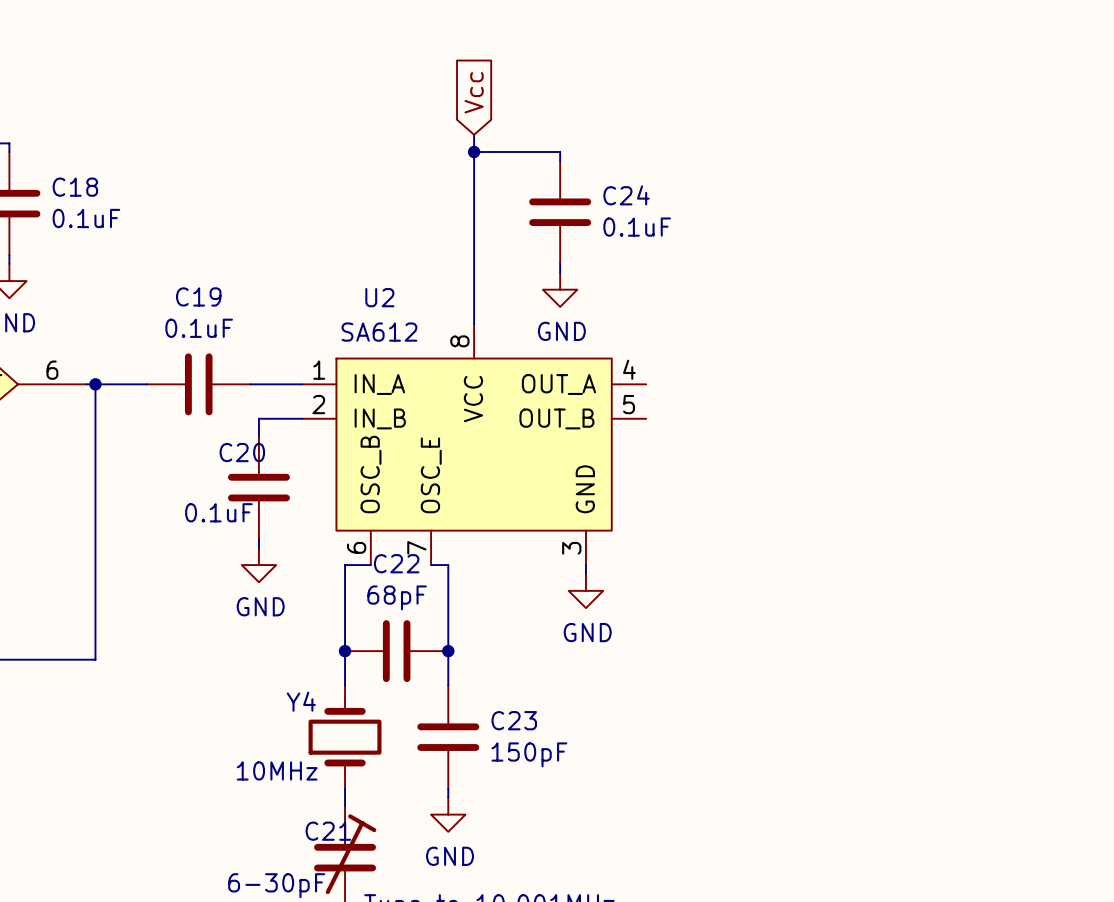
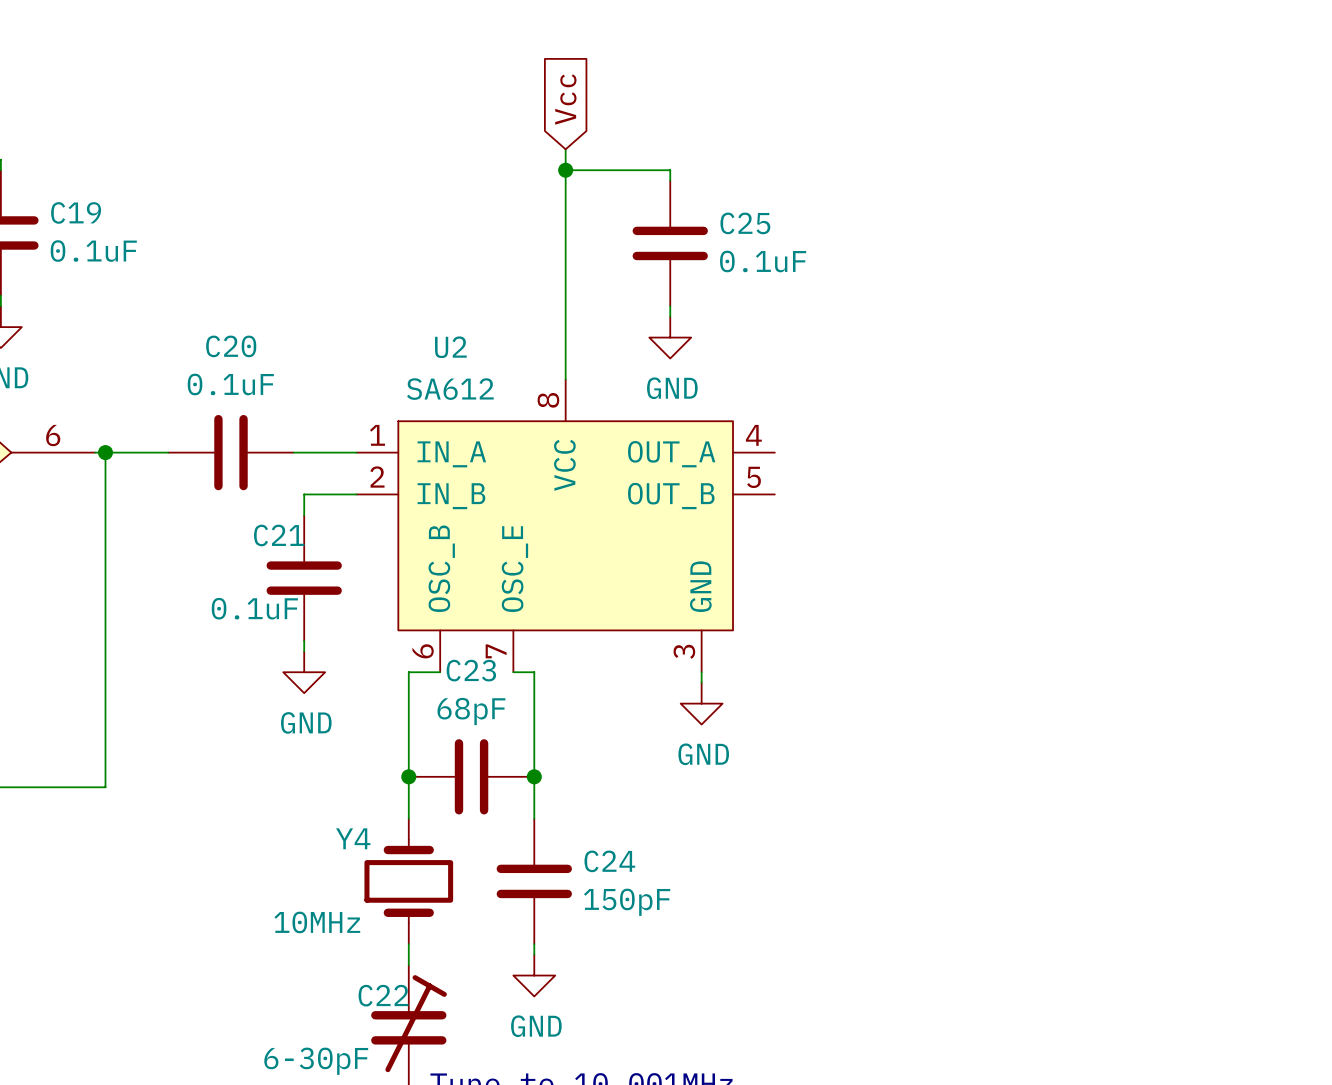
C18 name: C18 (75, 187) -> C19 (76, 212)
C24 name: C24 (626, 195) -> C25 (745, 223)
C19 name: C19 (198, 296) -> C20 (231, 346)
C20 name: C20 (242, 452) -> C21 (279, 535)
C22 name: C22 (396, 563) -> C23 (471, 670)
C23 name: C23 (514, 720) -> C24 (609, 861)
C21 name: C21 (328, 831) -> C22 (383, 995)

